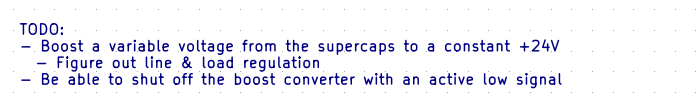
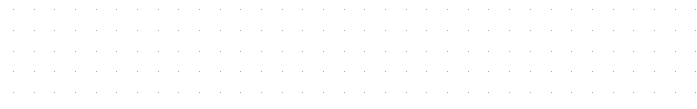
text: TODO: (41, 28) -> none
text: - Boost a variable voltage from the supercaps to a constant +24V (290, 47) -> none
text: - Figure out line & load regulation (177, 64) -> none
text: - Be able to shut off the boost converter with an active low signal (291, 80) -> none

